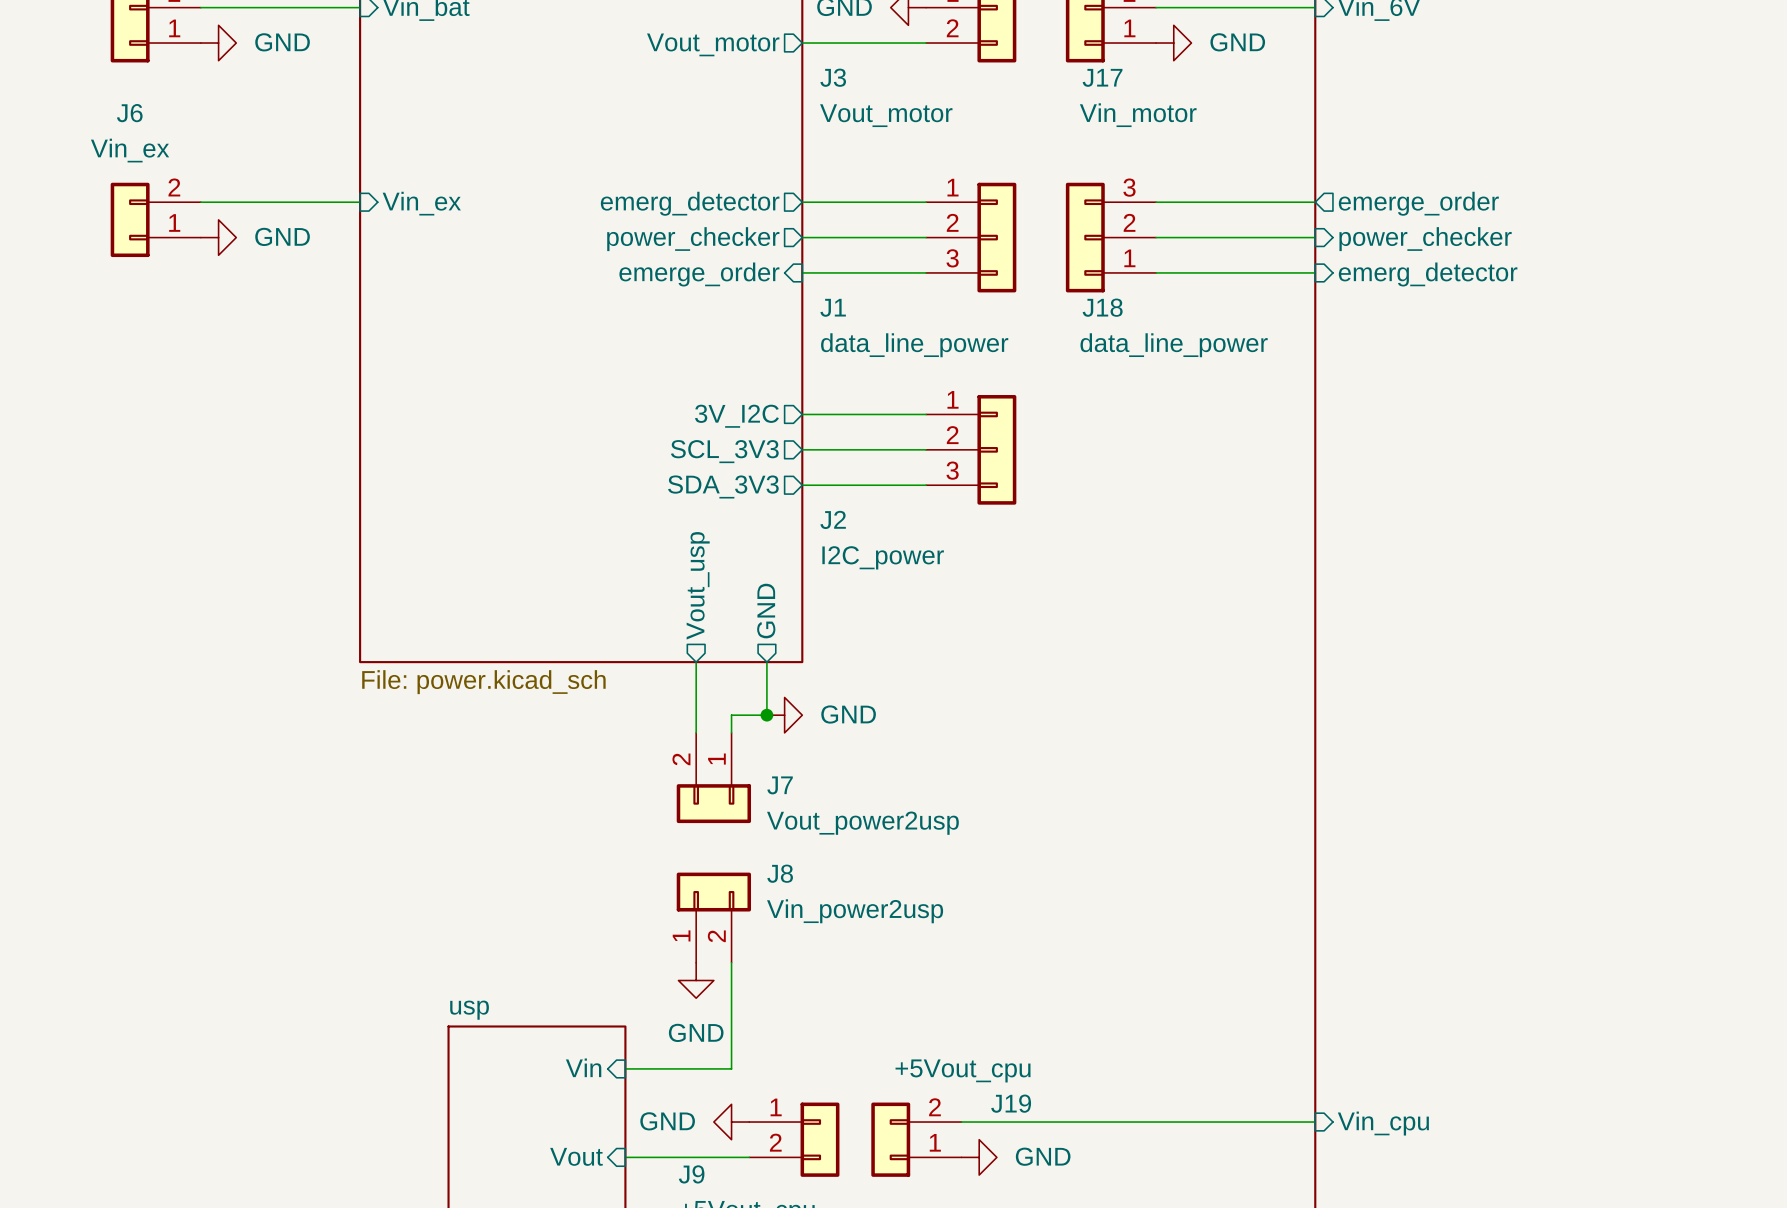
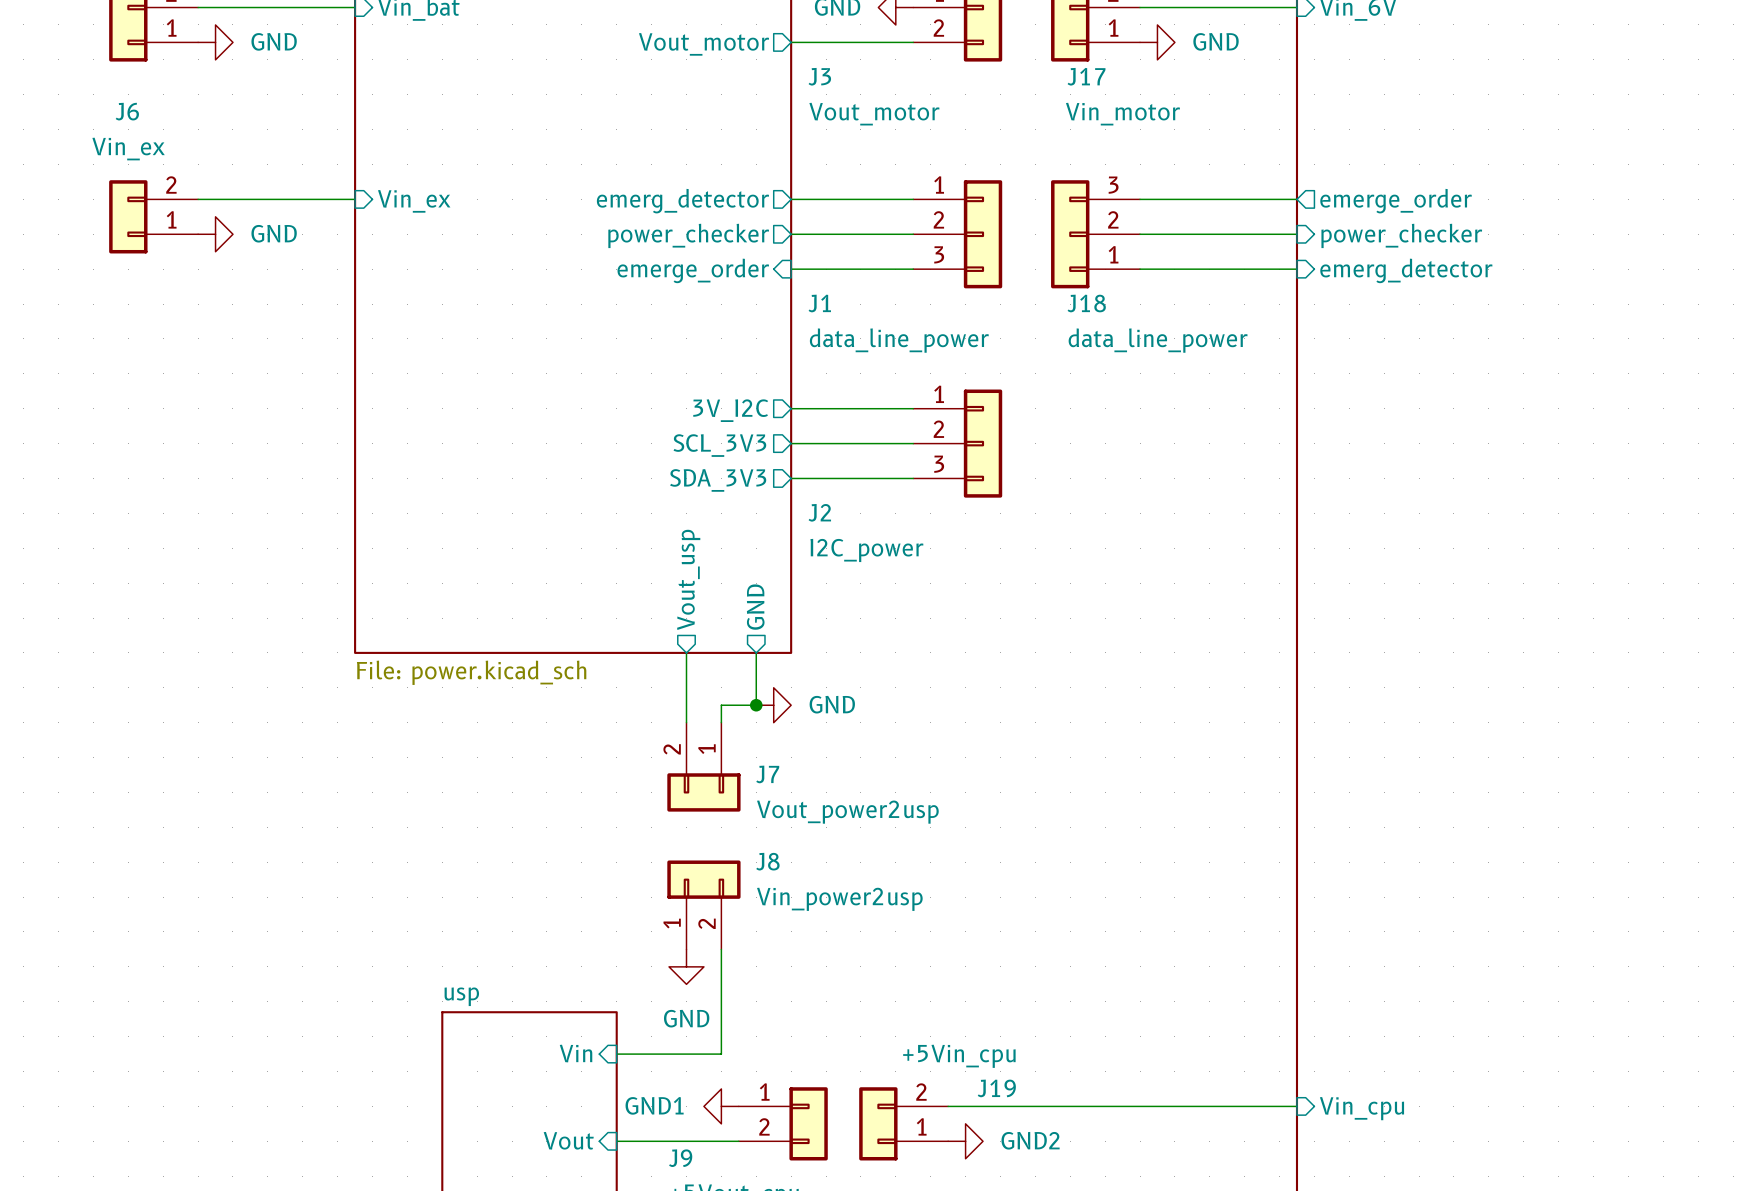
J19 value: +5Vout_cpu (963, 1070) -> +5Vin_cpu (959, 1056)
power symbol: GND (731, 1122) -> GND1 (721, 1106)
power symbol: GND (979, 1157) -> GND2 (965, 1141)

